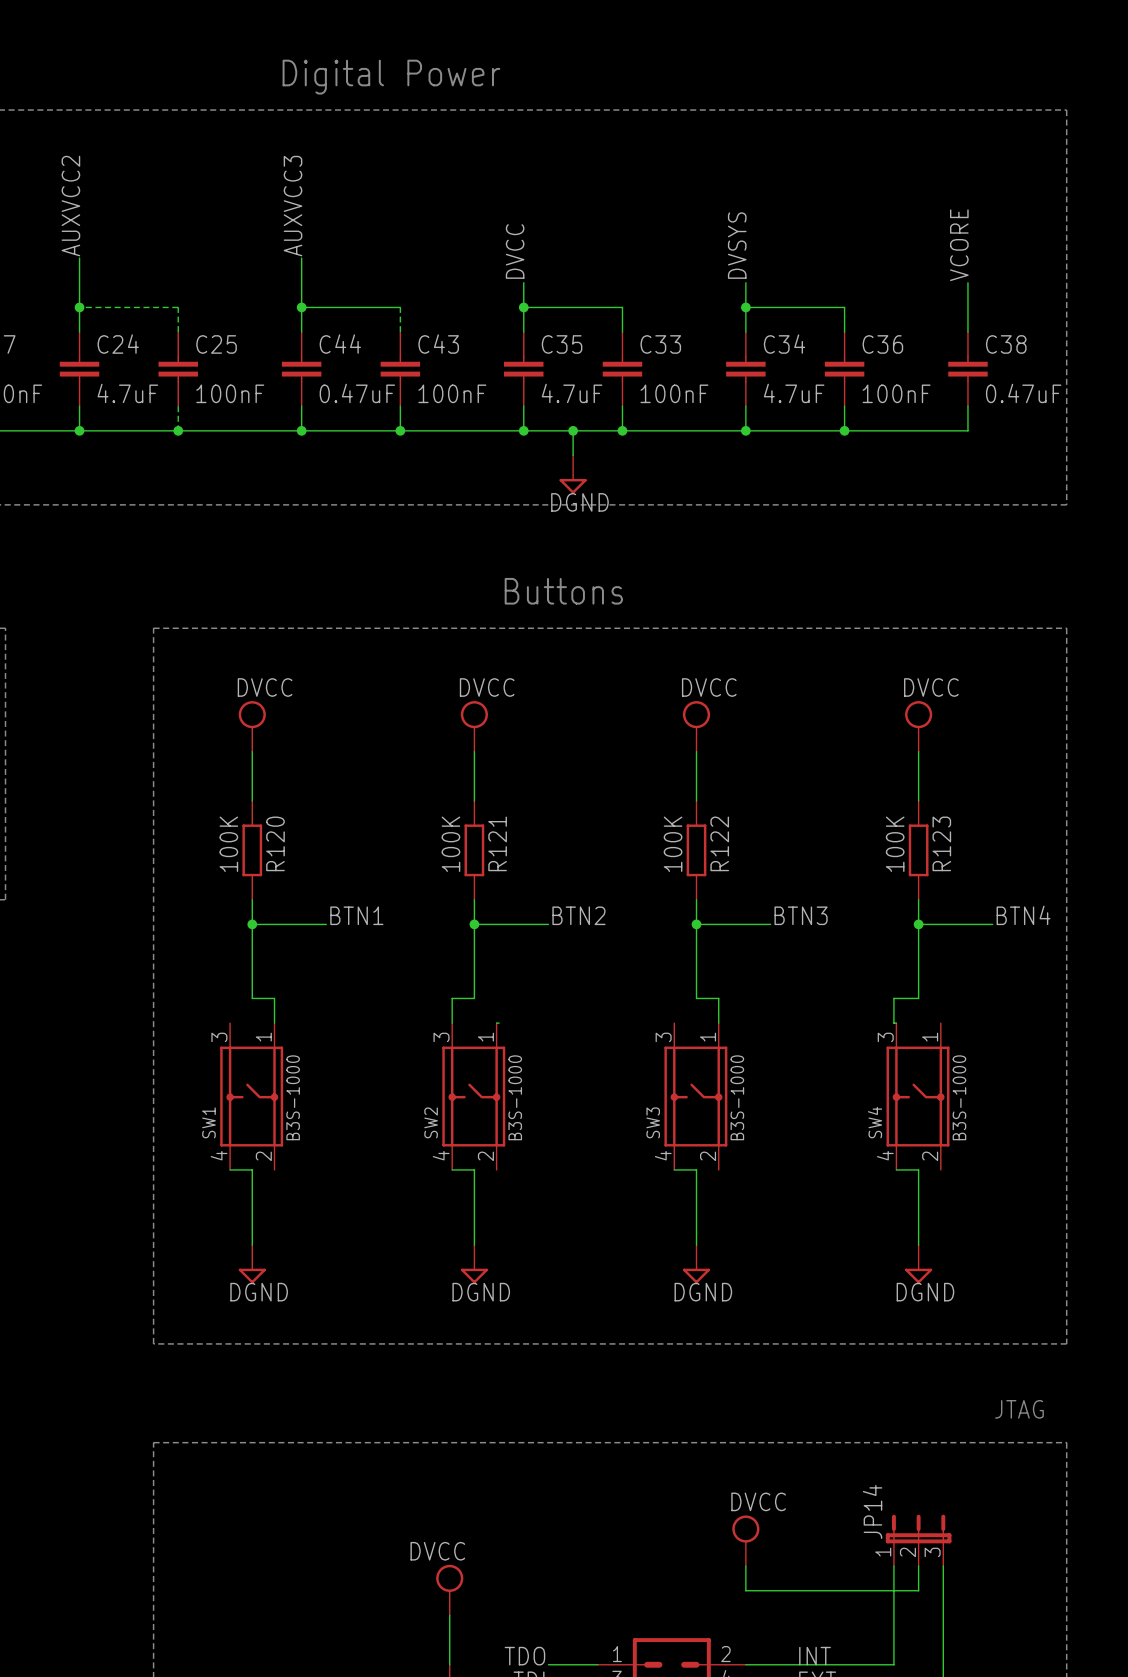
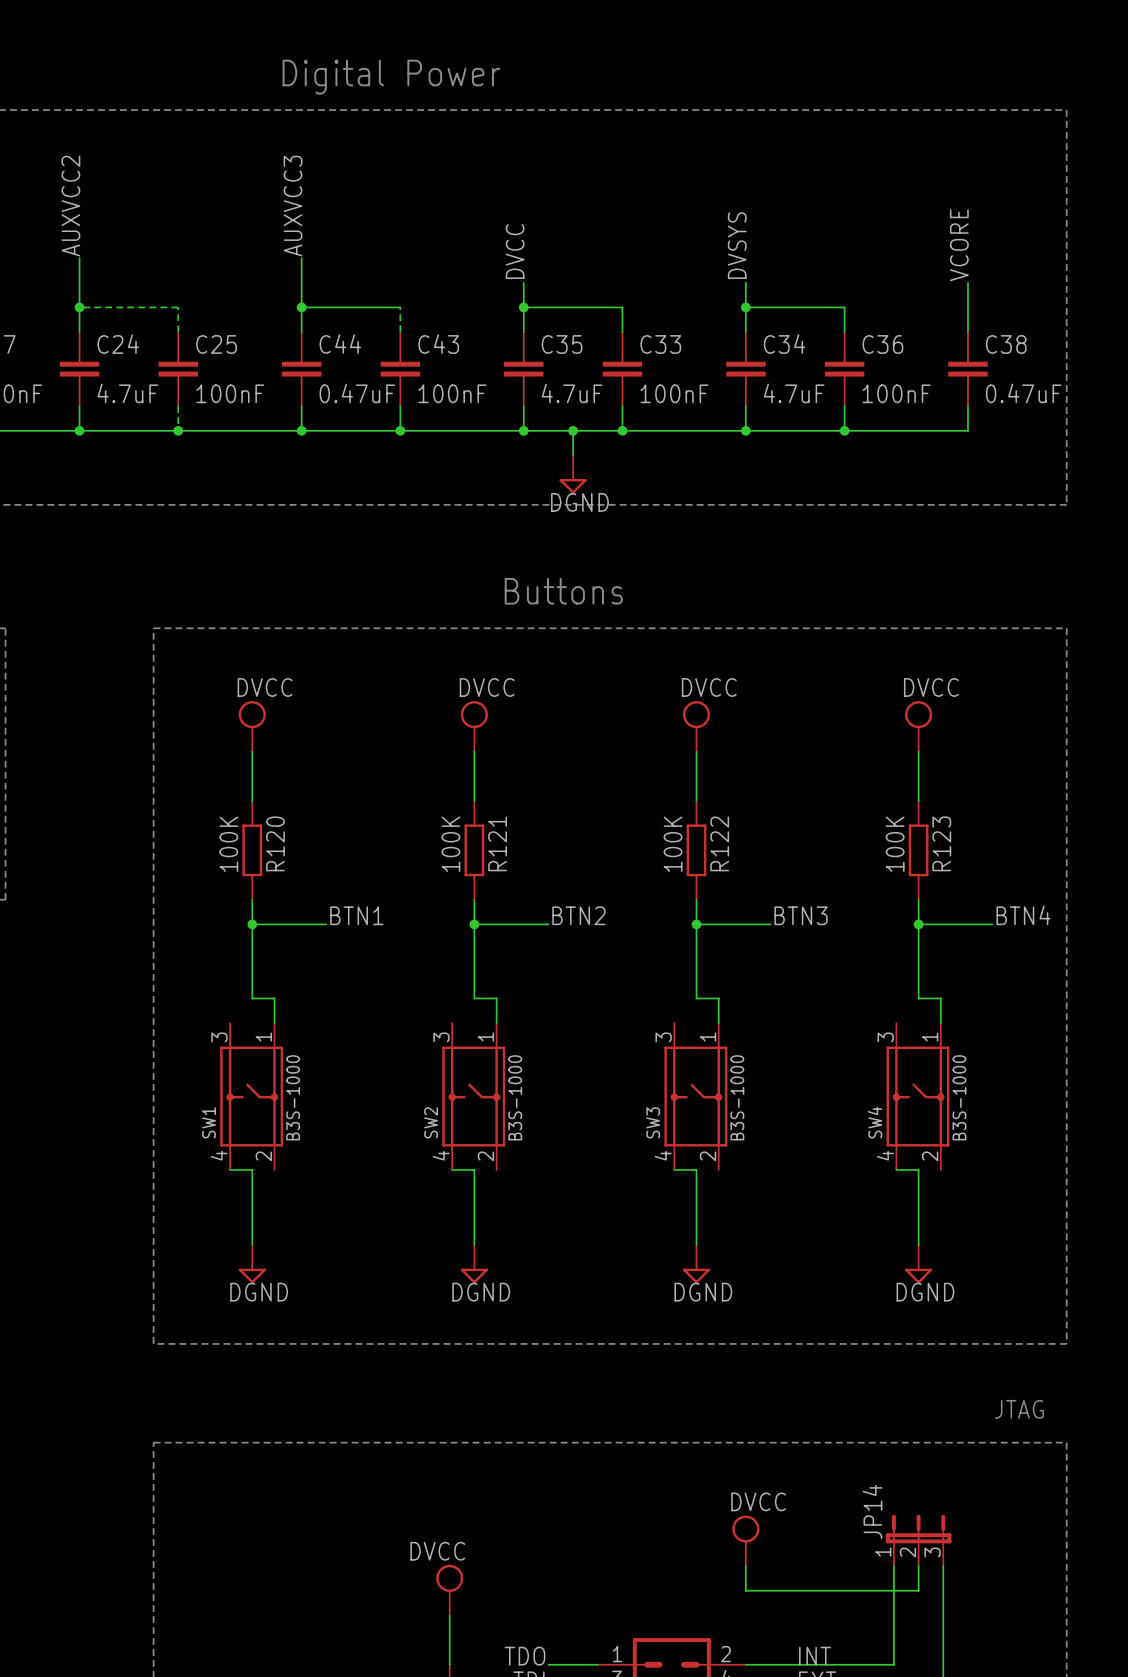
wire: (474, 998) (452, 998) (452, 1023) -> none
wire: (918, 998) (893, 998) (893, 1023) (896, 1023) -> (918, 998) (940, 998) (940, 1023)
wire: (496, 1023) (499, 1023) -> (496, 1023) (496, 998) (474, 998)

